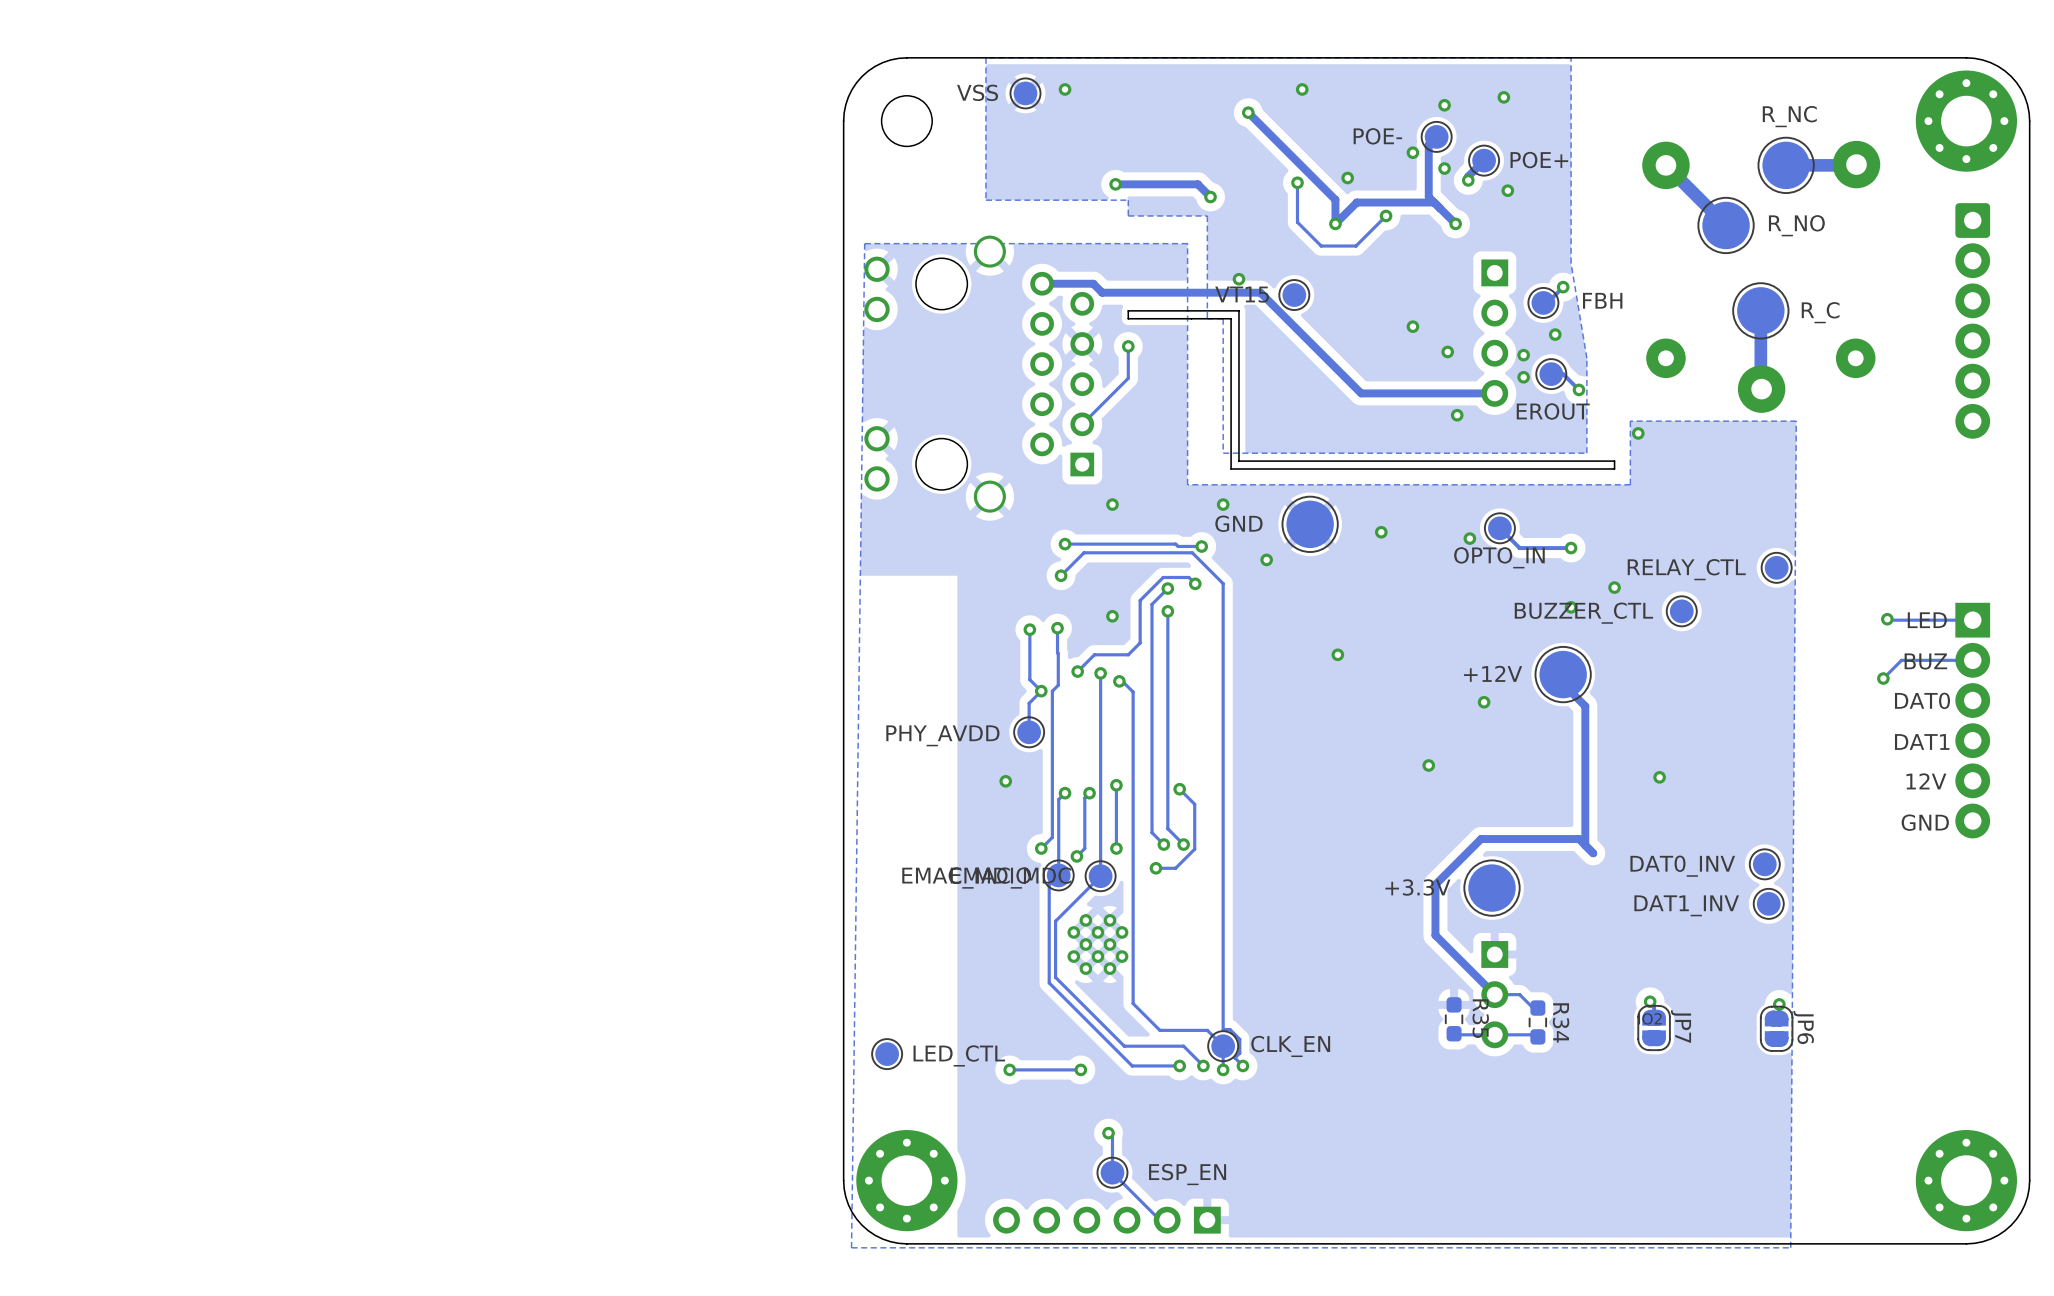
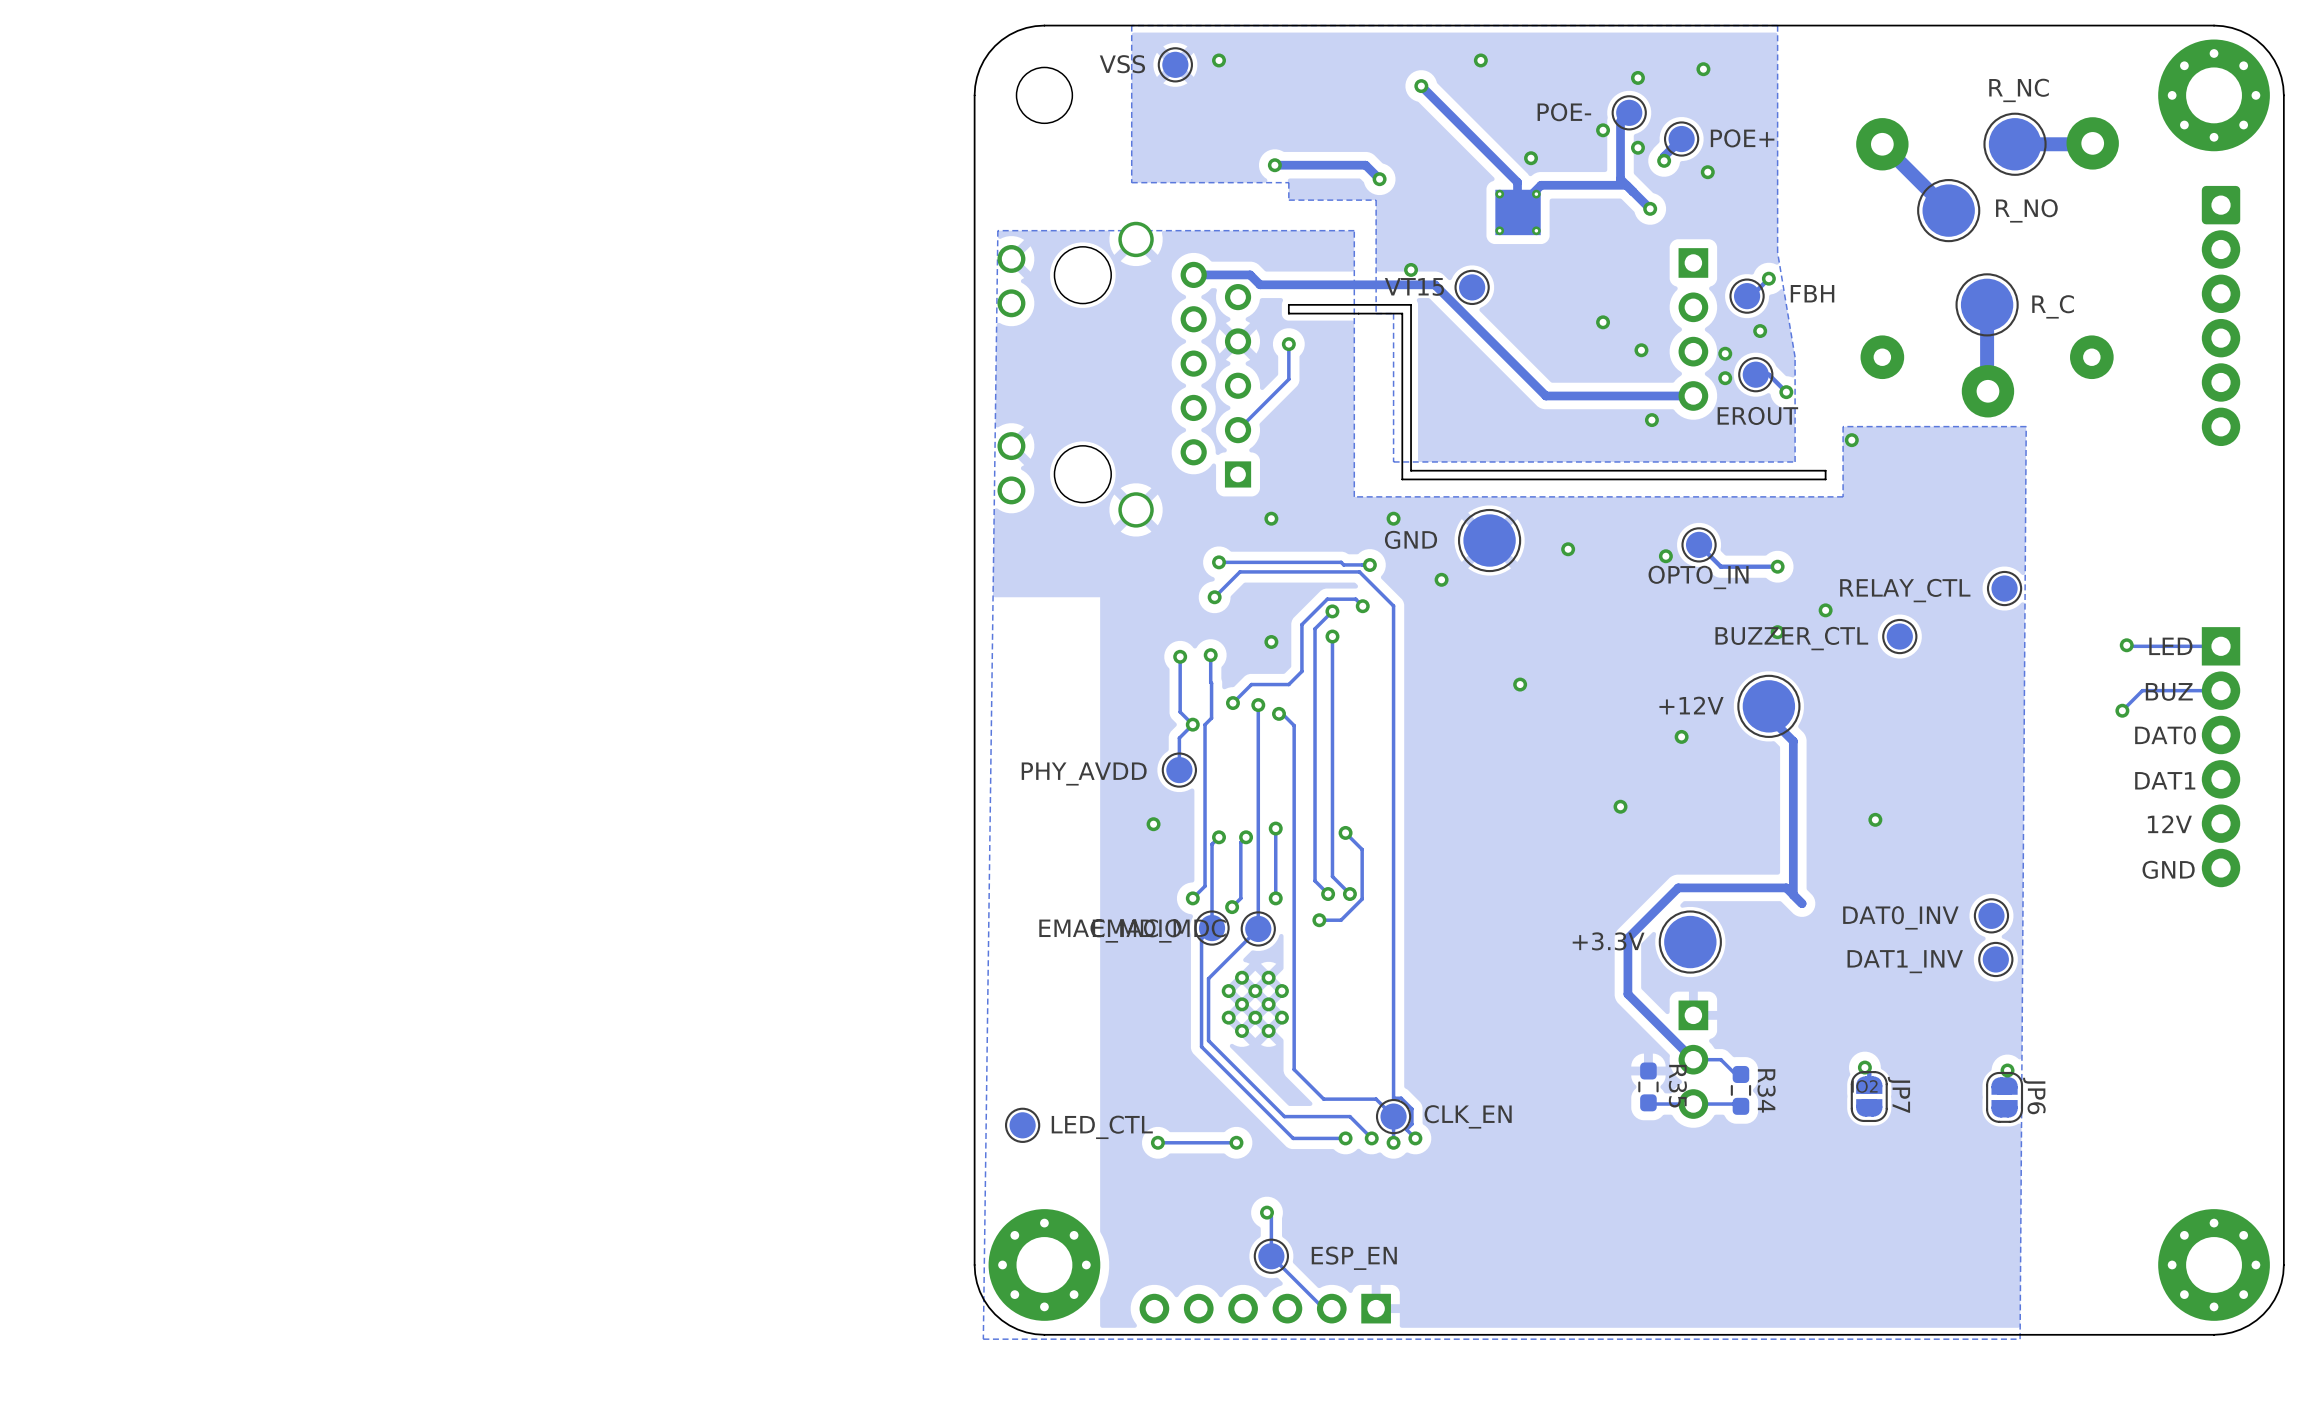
track: (1297, 182) (1297, 222) (1321, 246) (1356, 246) (1386, 215) -> none
via: (1297, 182) -> none
via: (1386, 215) -> none
via: (1335, 223) -> none
part: none -> (1518, 212)

